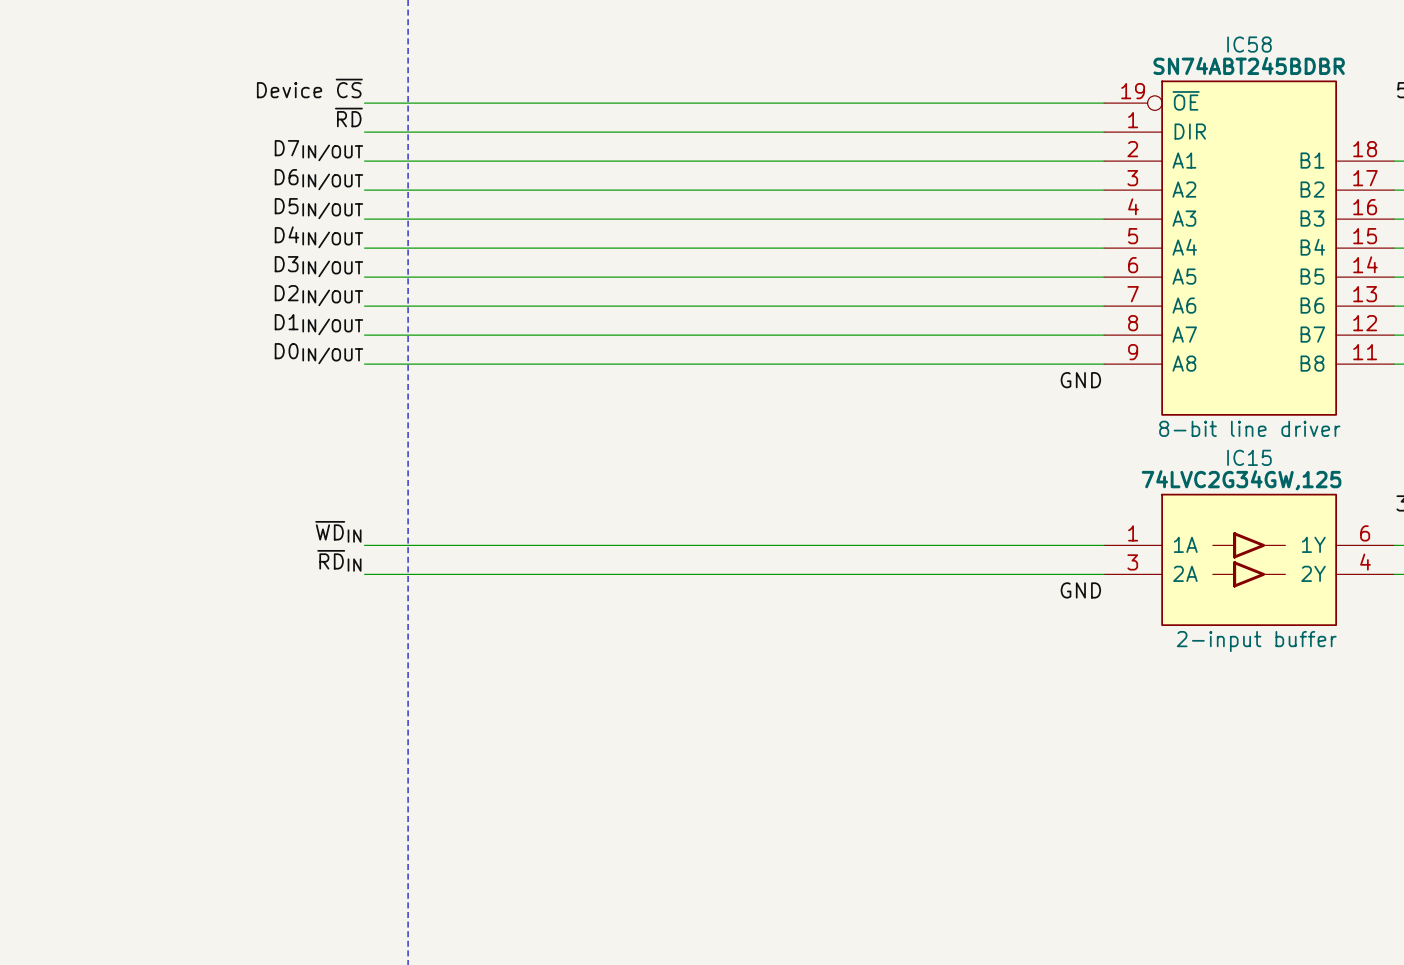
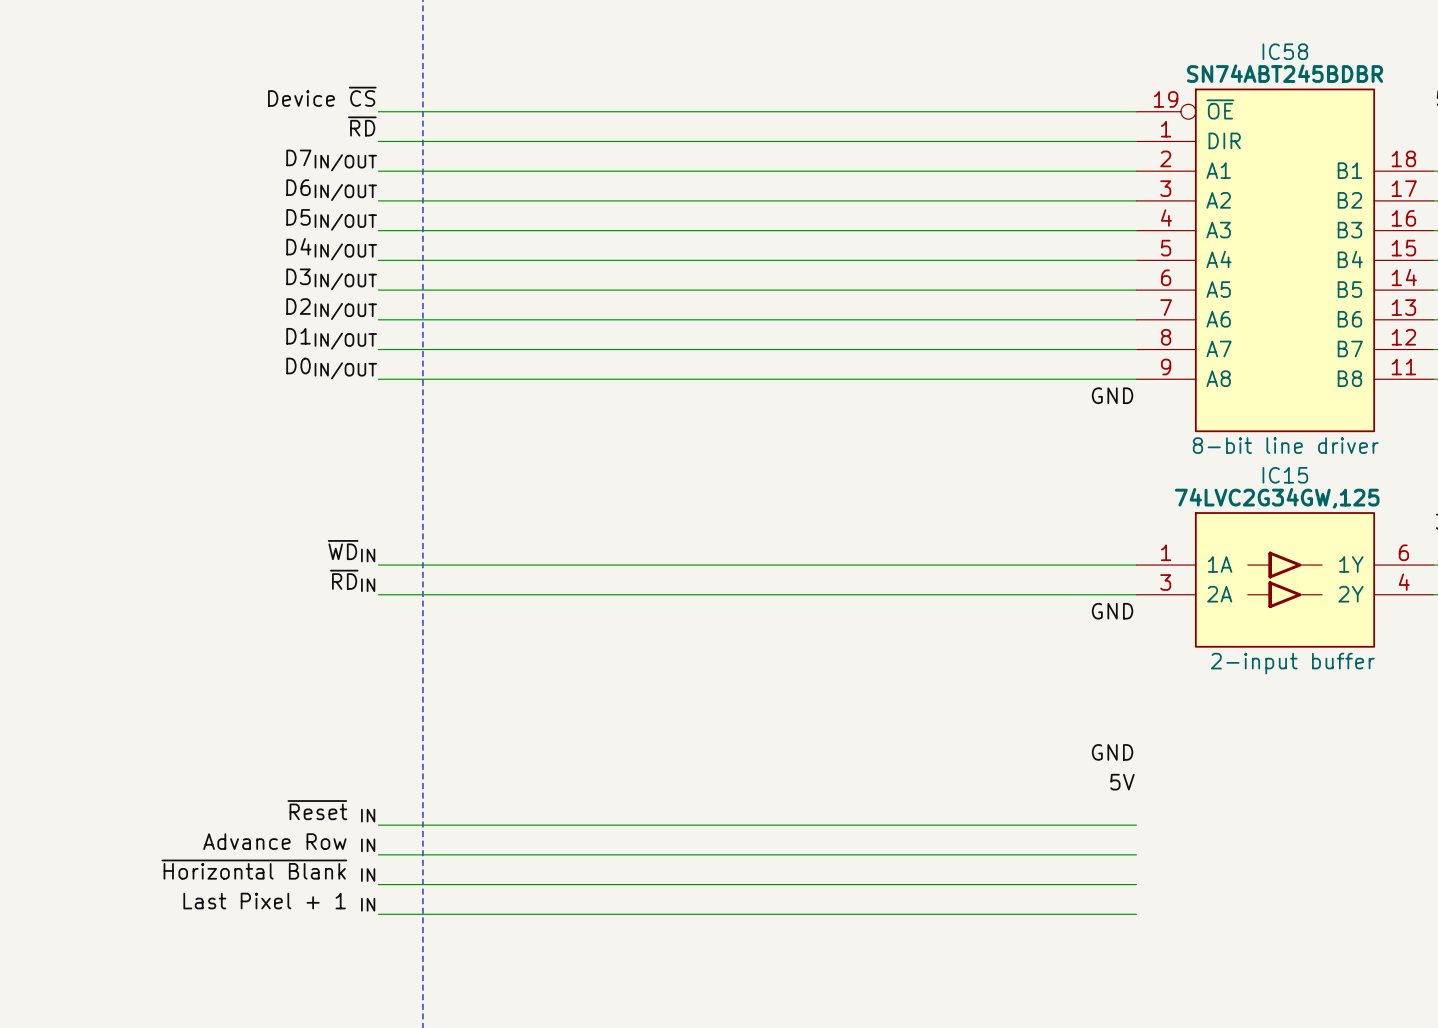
label: none -> GND (1112, 752)
label: none -> 5V (1122, 782)
label: none -> ~{Reset} IN (331, 811)
wire: none -> (378, 825) (1136, 825)
label: none -> Advance Row IN (289, 842)
wire: none -> (378, 854) (1136, 854)
label: none -> ~{Horizontal Blank} IN (268, 870)
wire: none -> (378, 884) (1136, 884)
label: none -> Last Pixel + 1 IN (279, 902)
wire: none -> (378, 914) (1136, 914)

